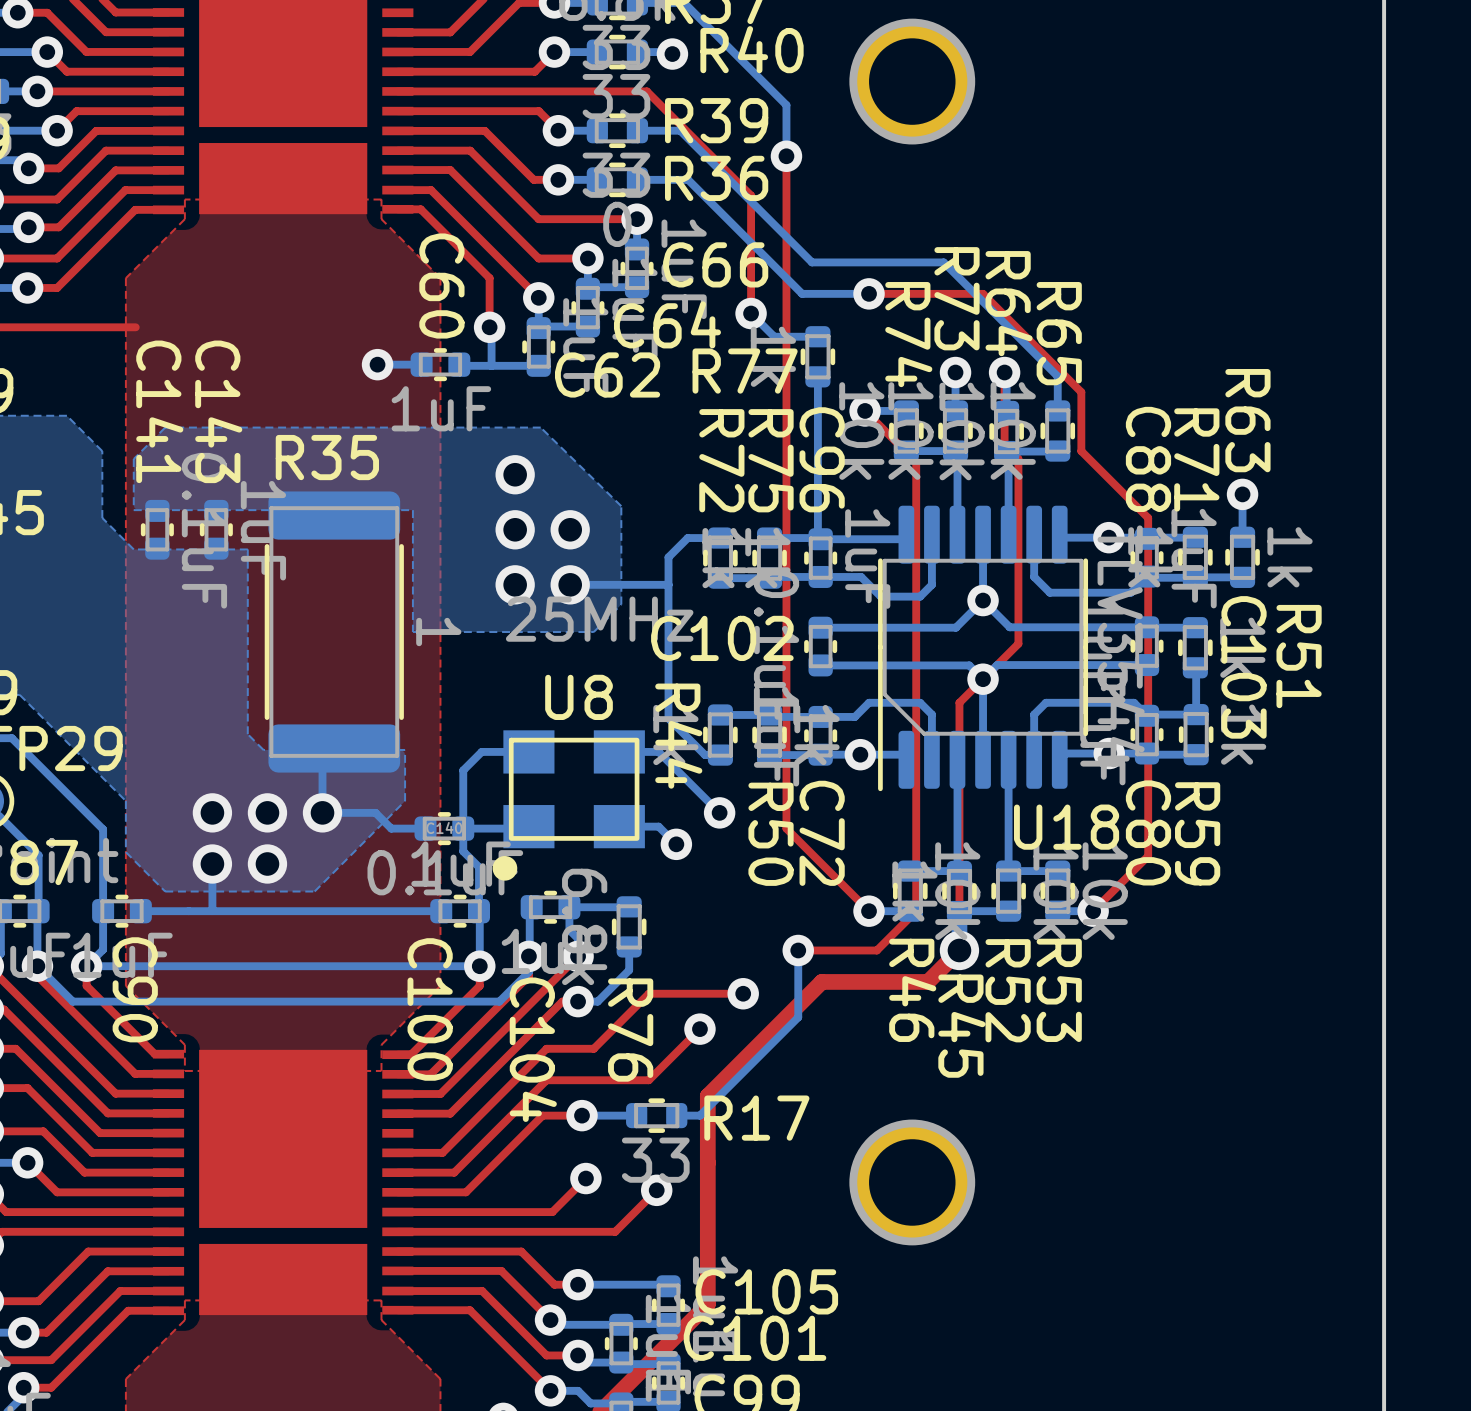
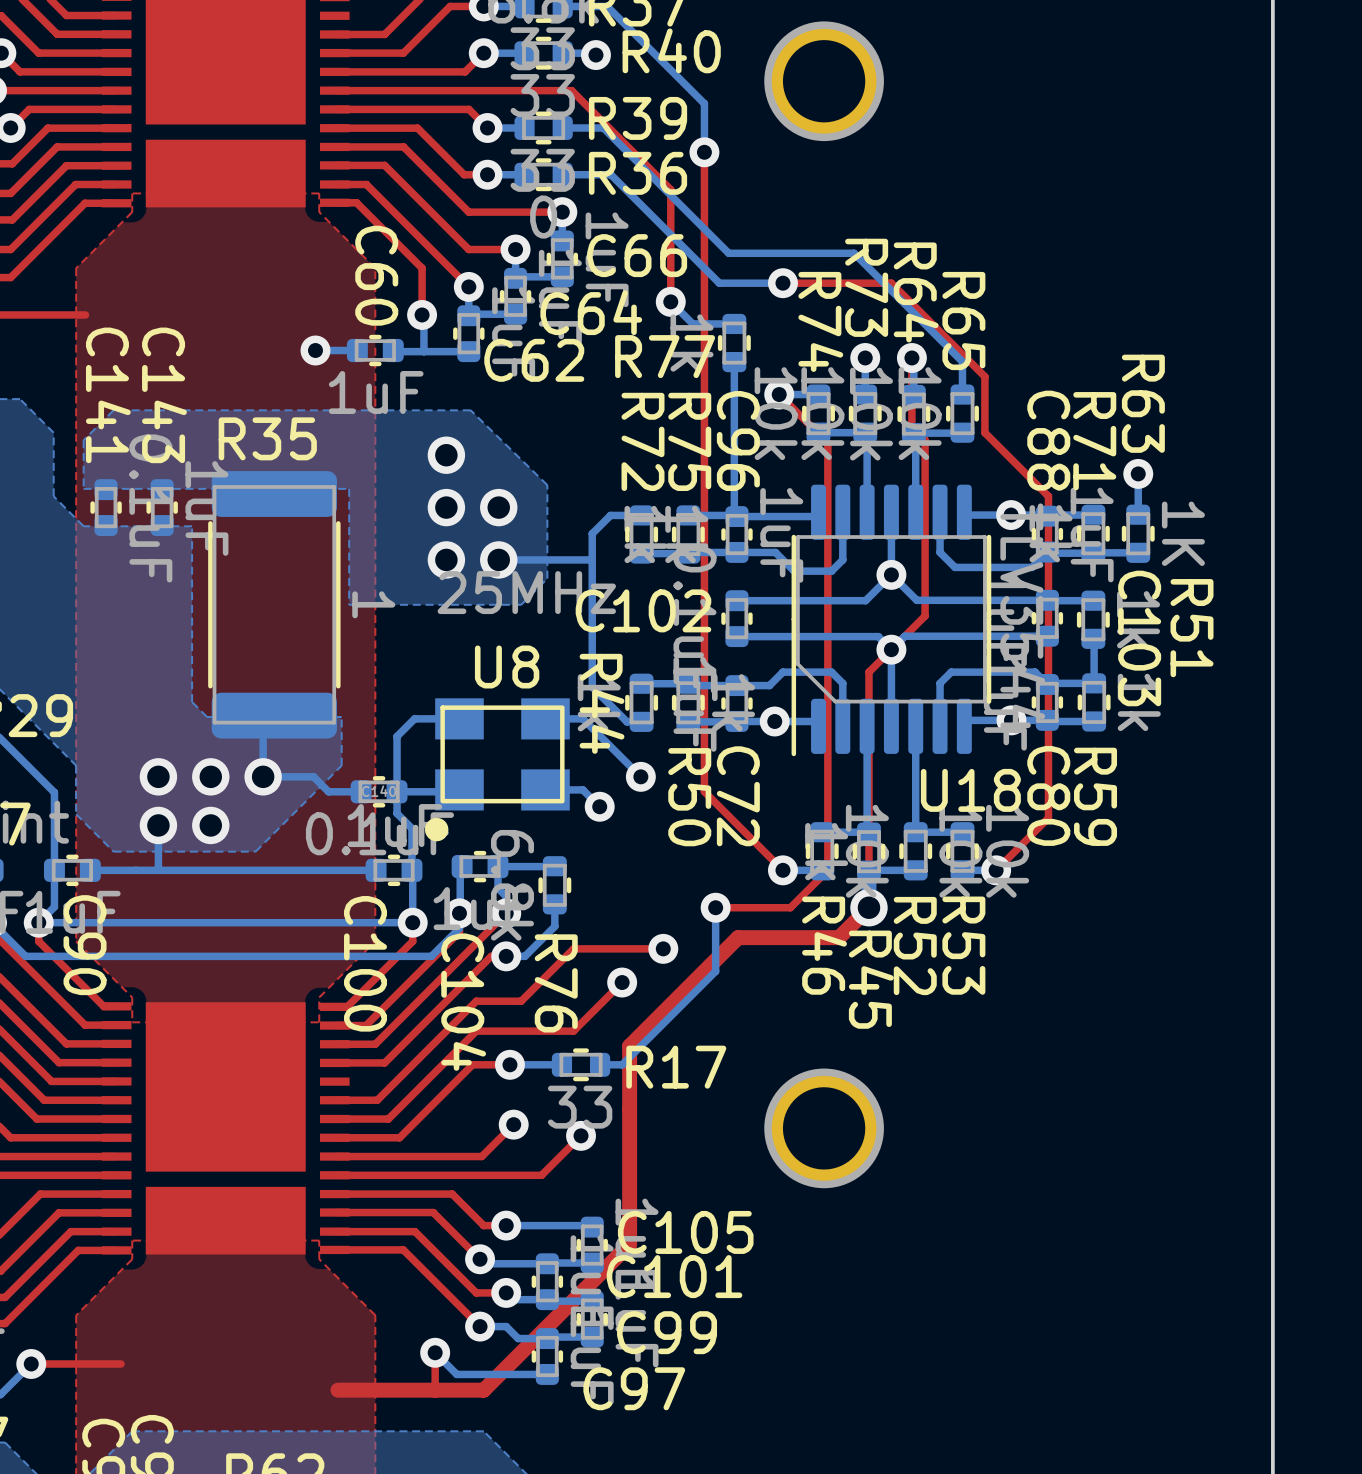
R63 value: 1k (1290, 557) -> 1K (1183, 533)

